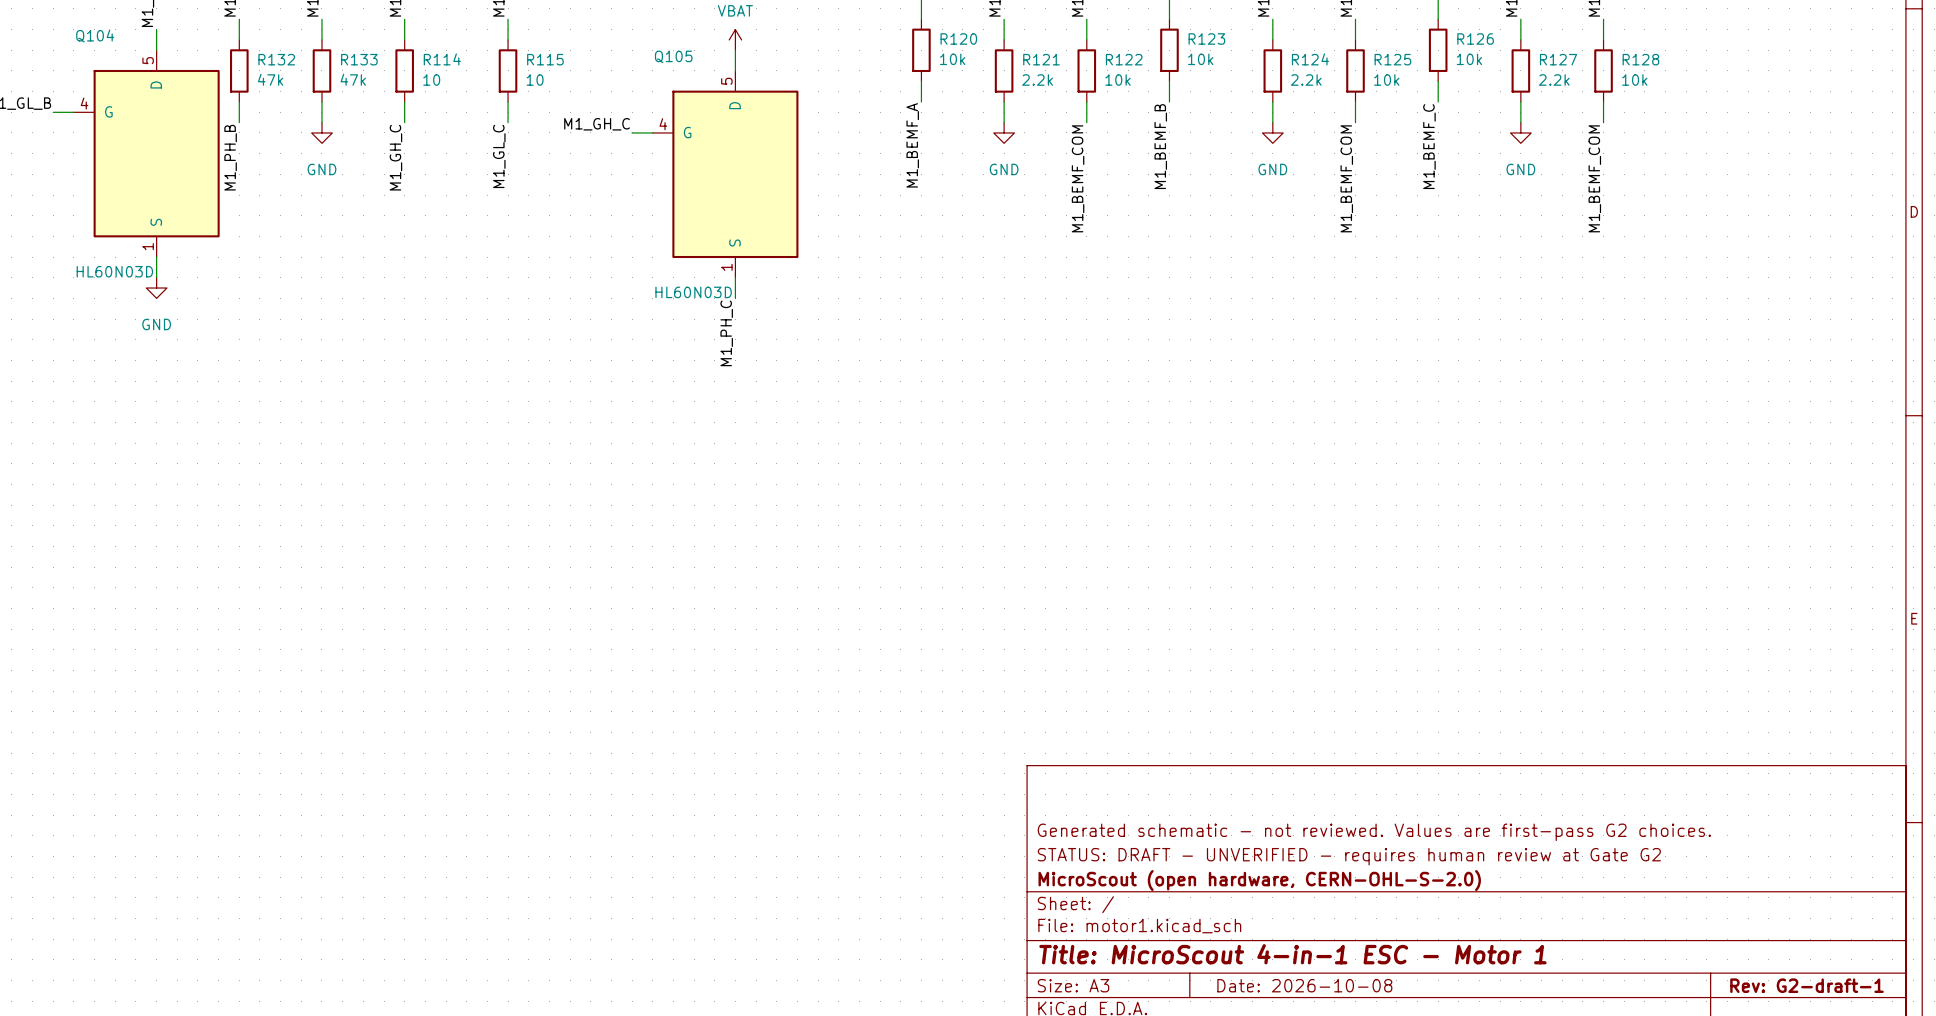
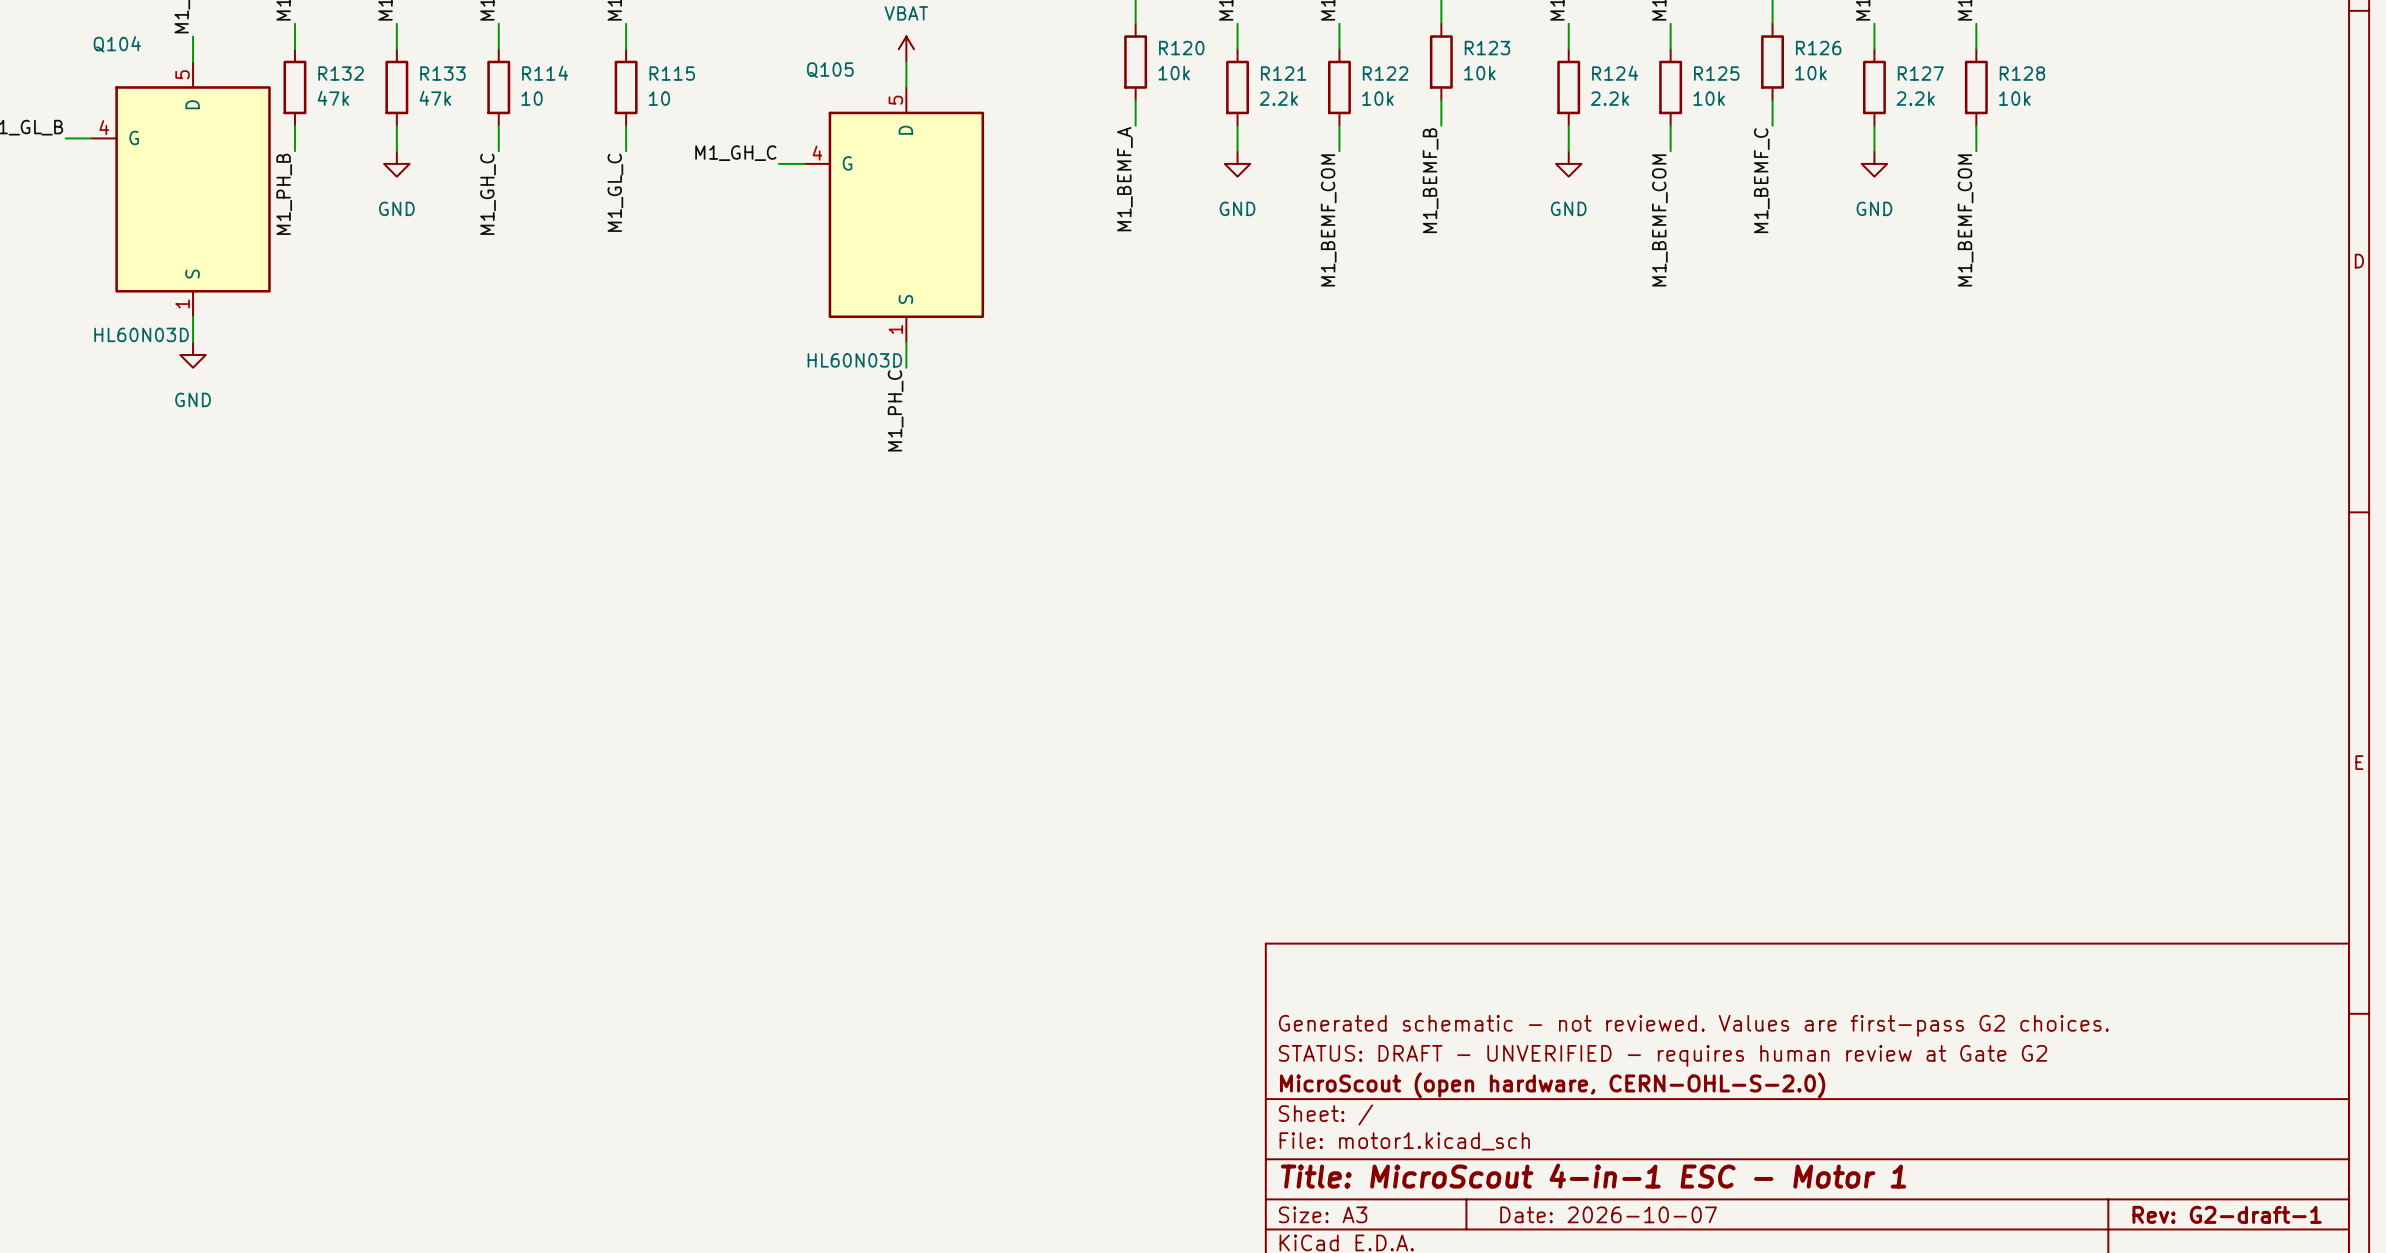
title block: Date: 2026-10-08 (1304, 985) -> Date: 2026-10-07 (1608, 1214)

